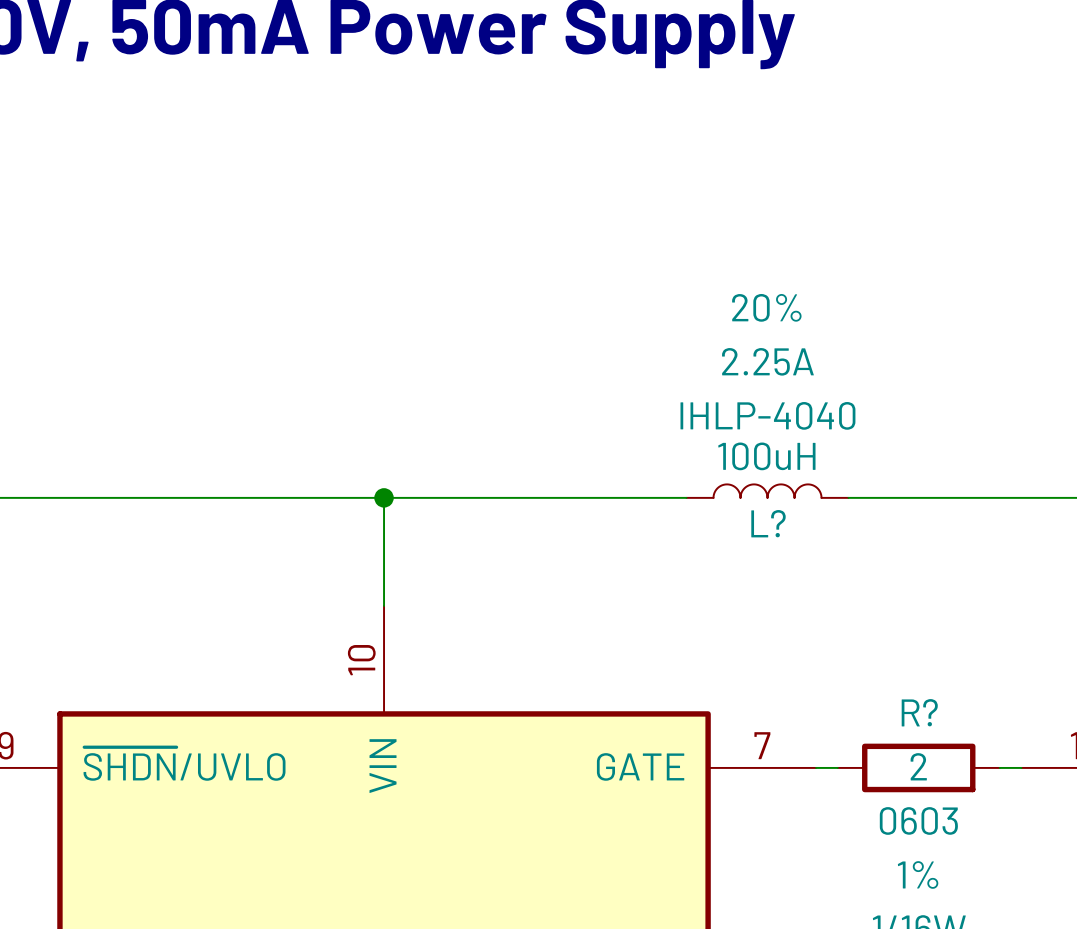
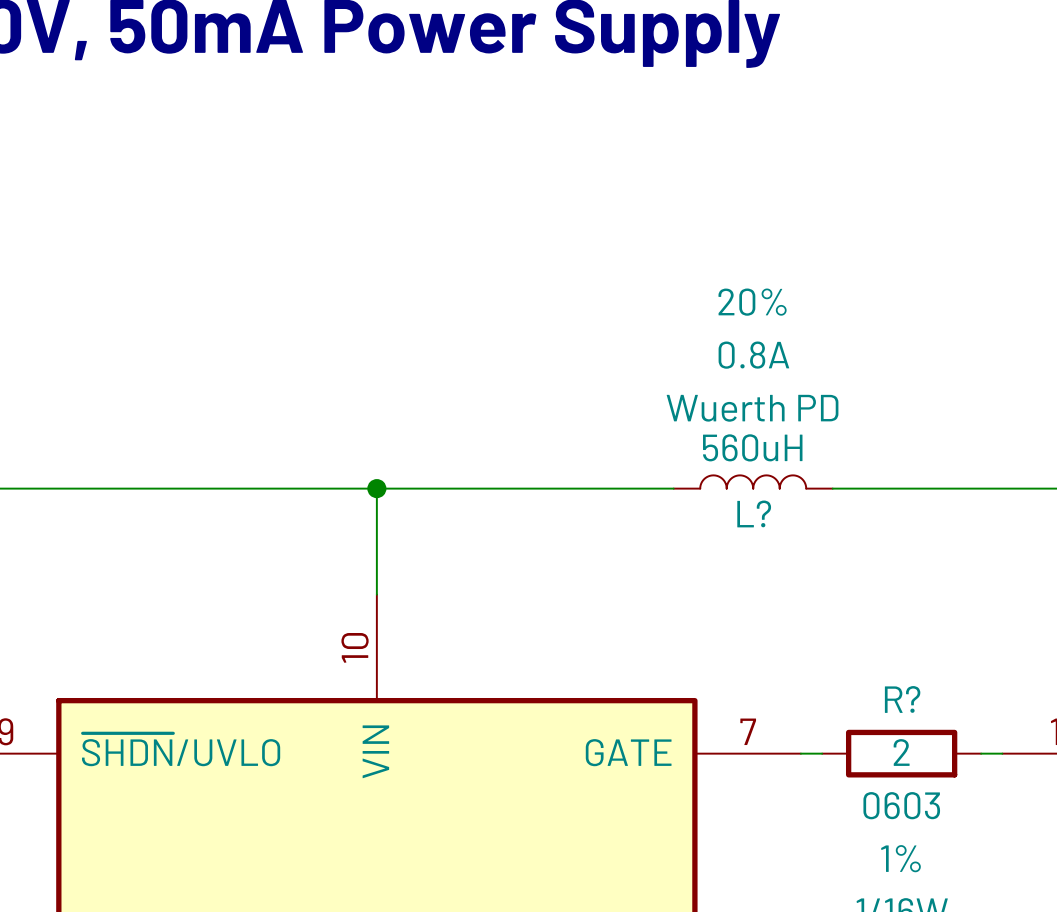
L? text: 2.25A (767, 361) -> 0.8A (753, 355)
L? text: IHLP-4040 (767, 415) -> Wuerth PD (752, 408)
L? value: 100uH (766, 456) -> 560uH (752, 447)

